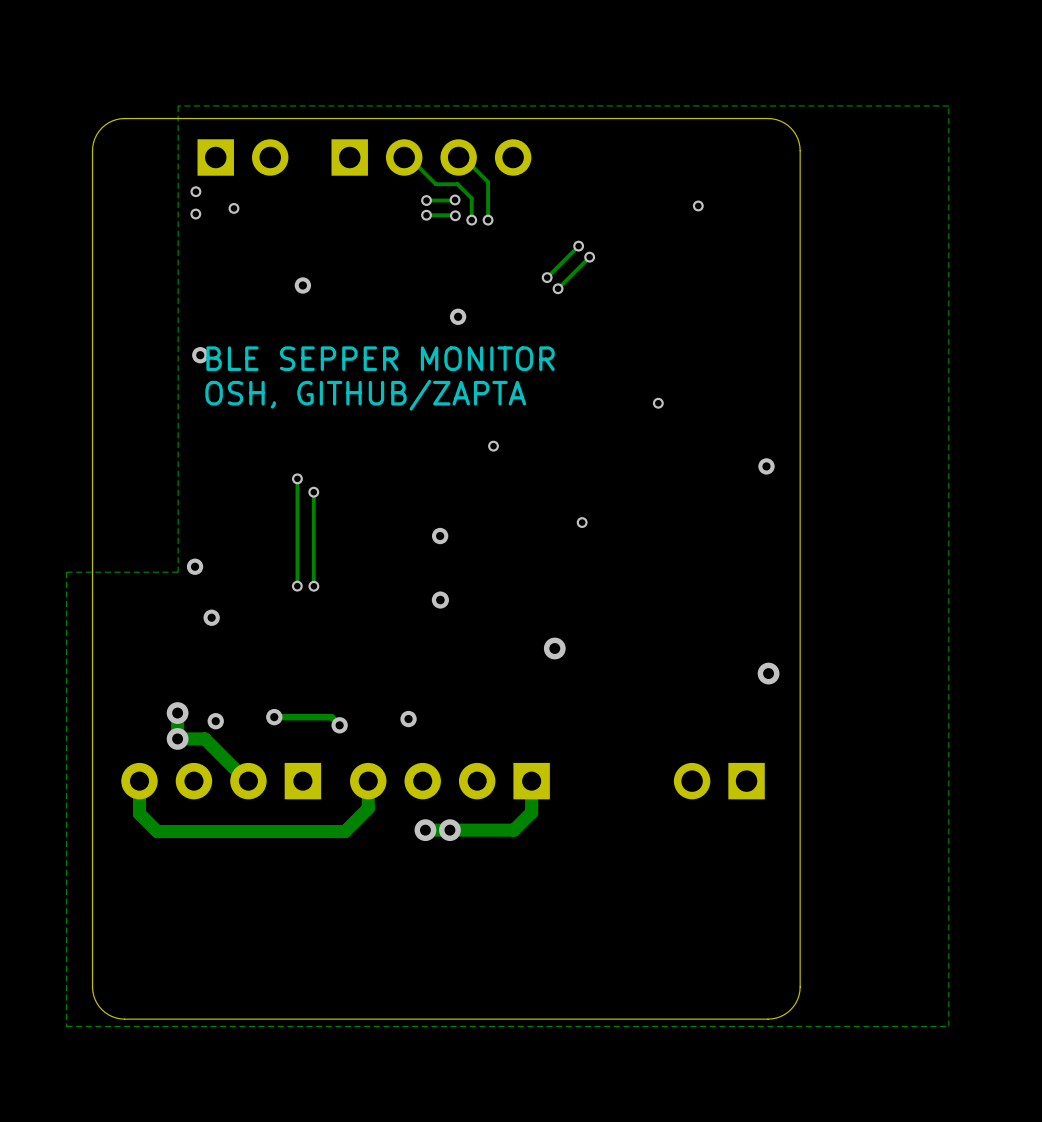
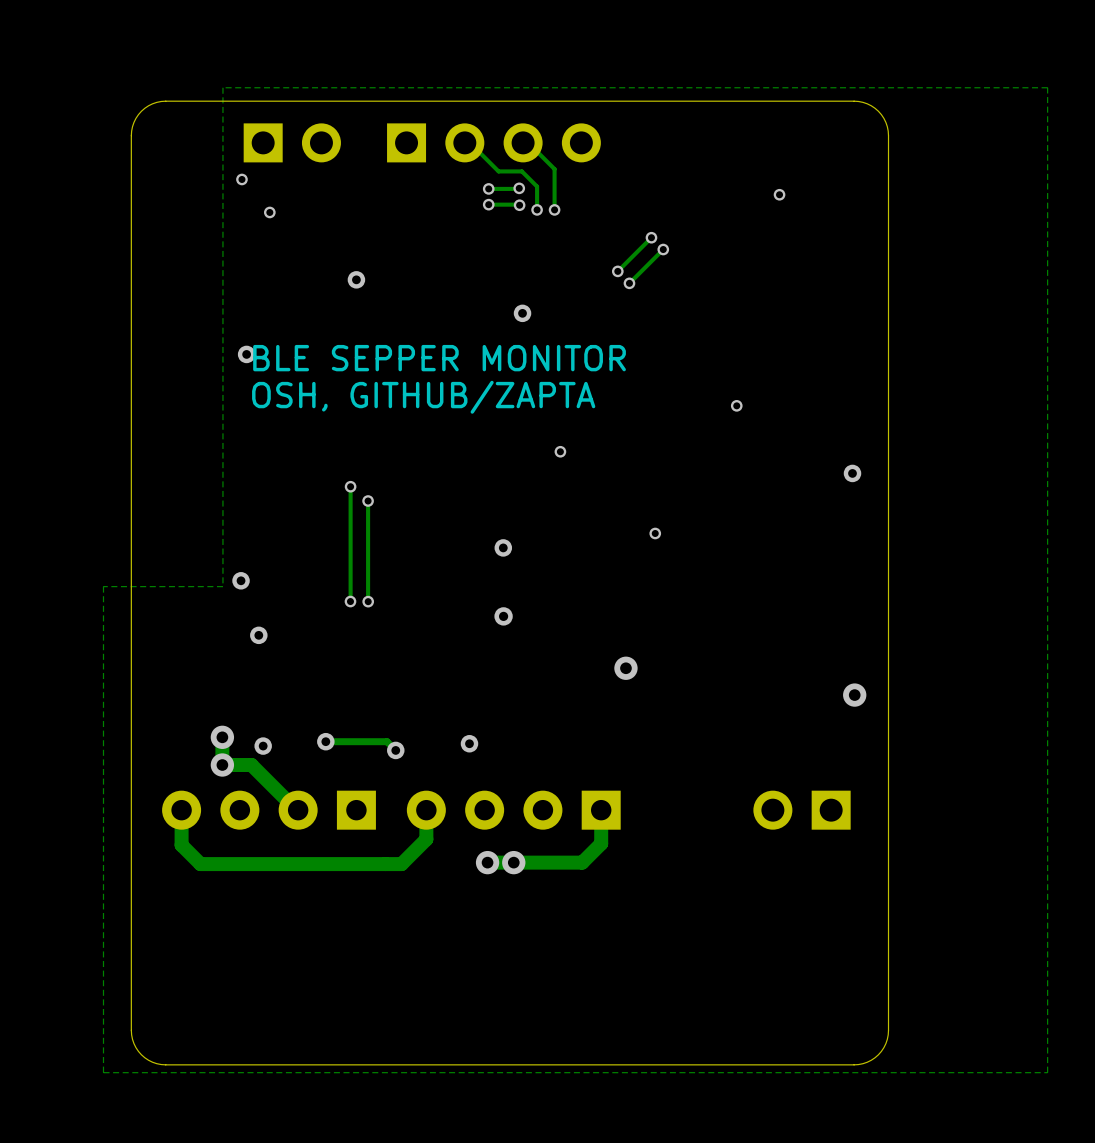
via: (233, 208) -> none
via: (195, 214) -> none
via: none -> (269, 212)

